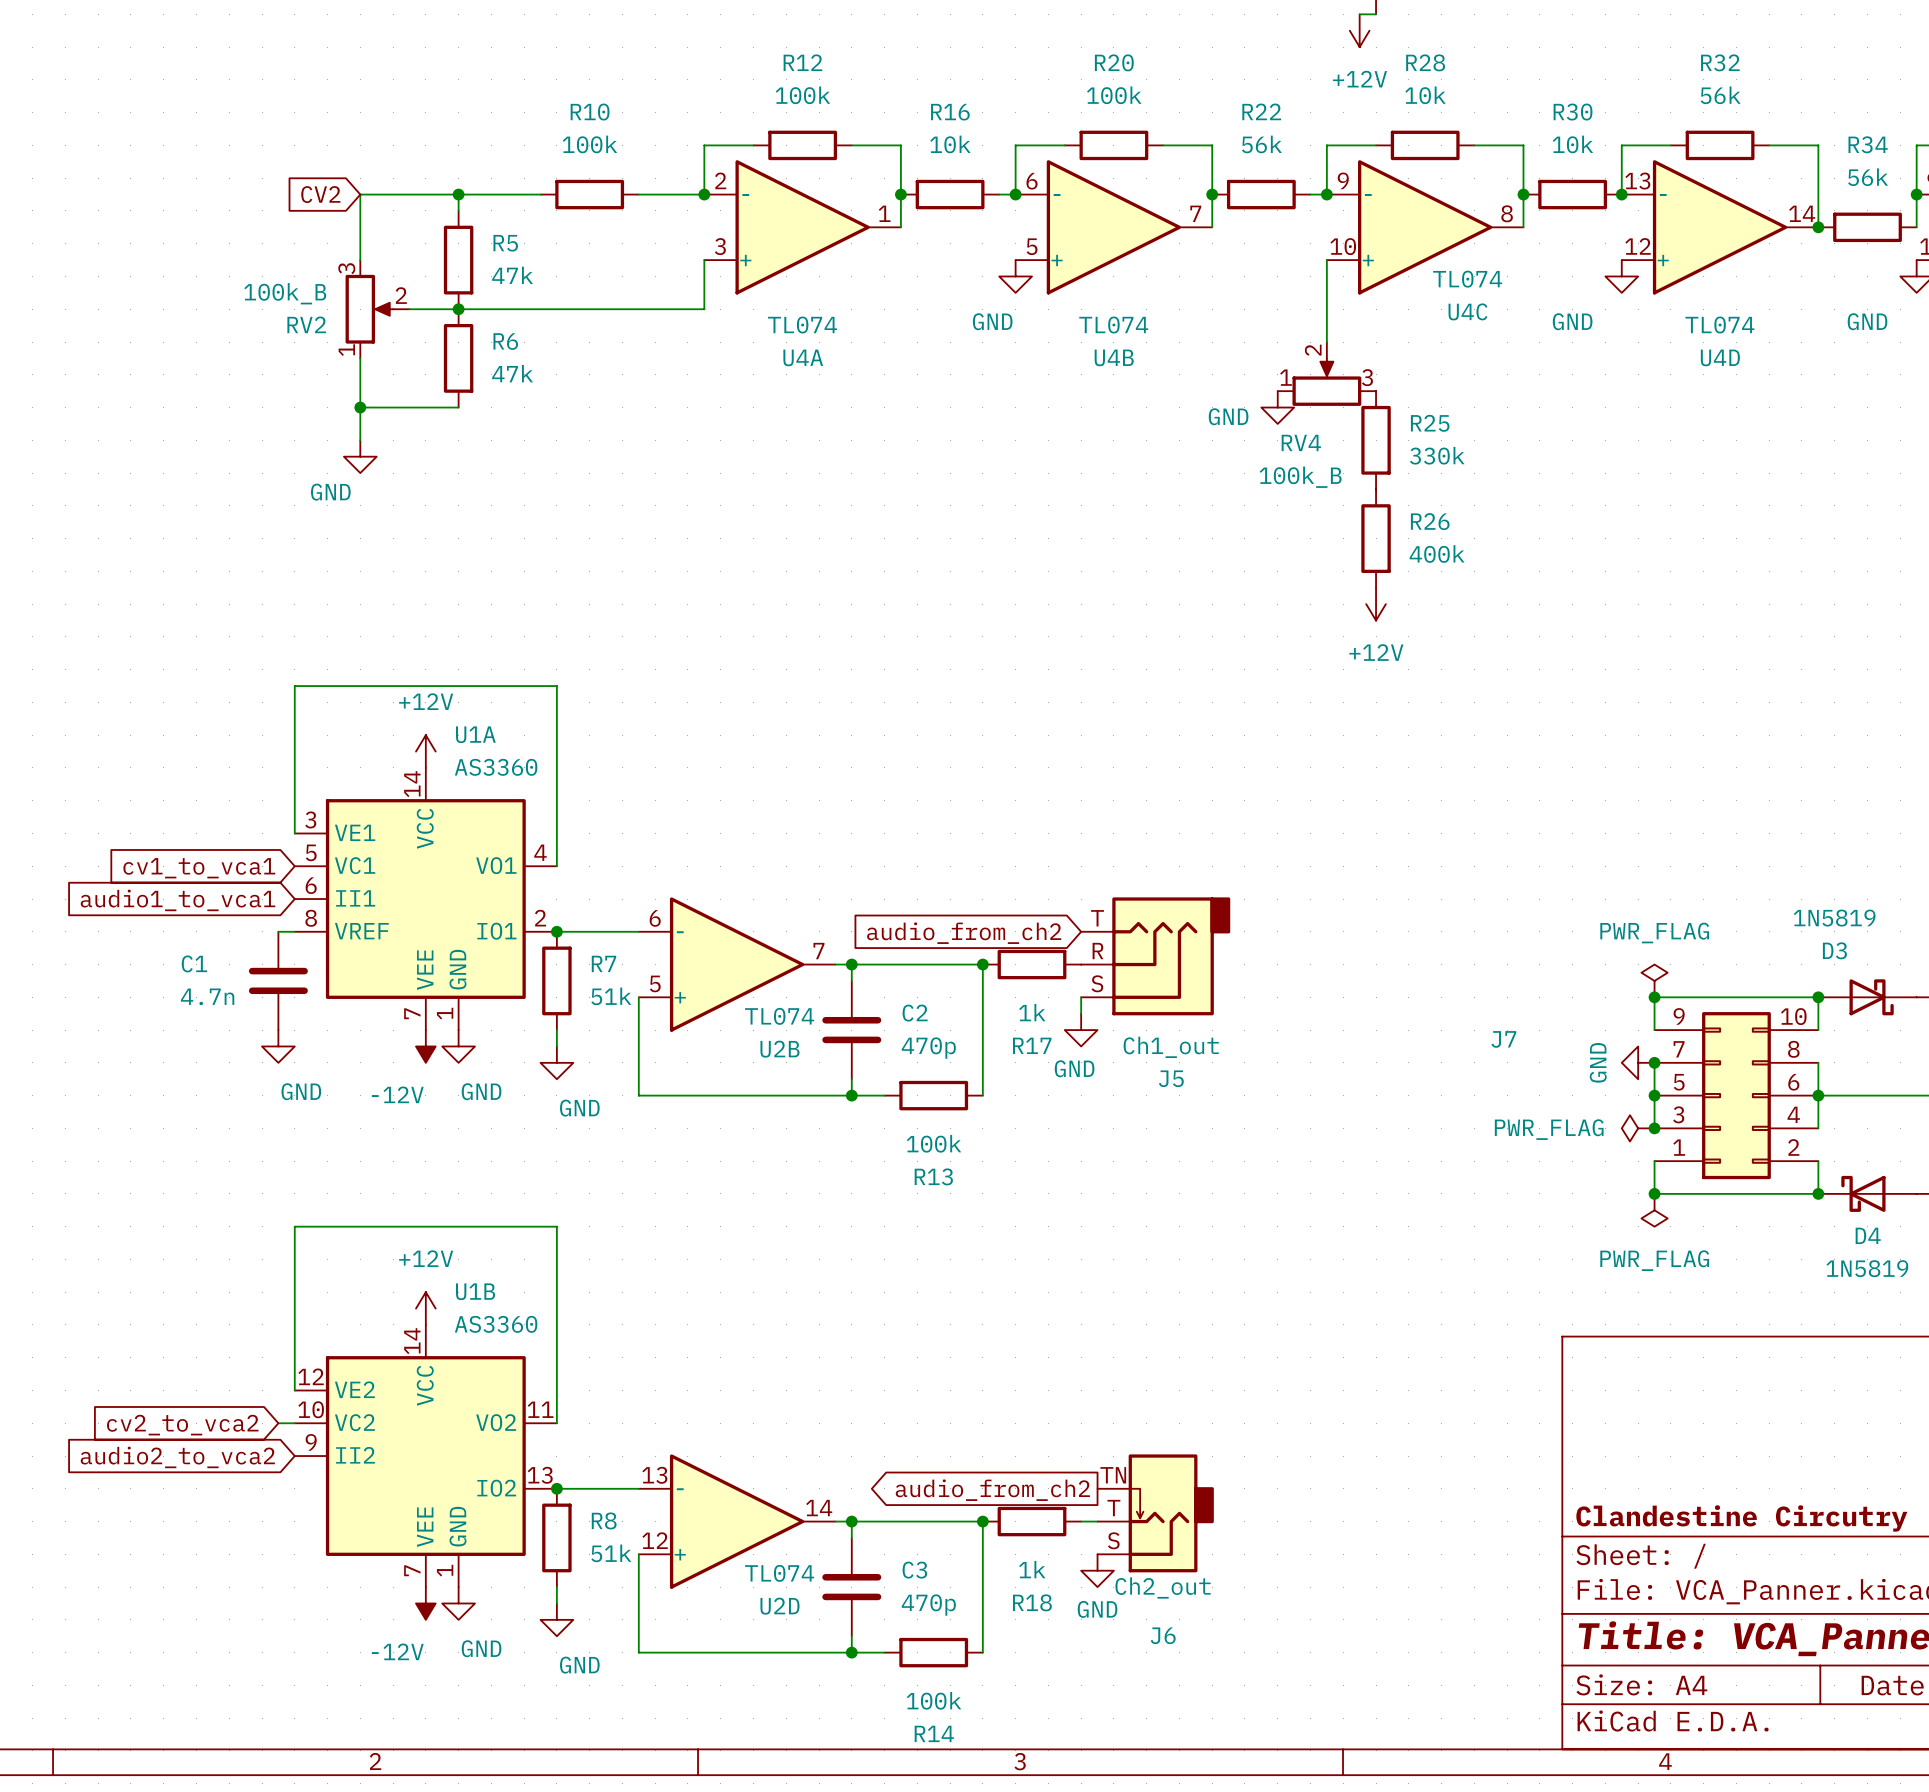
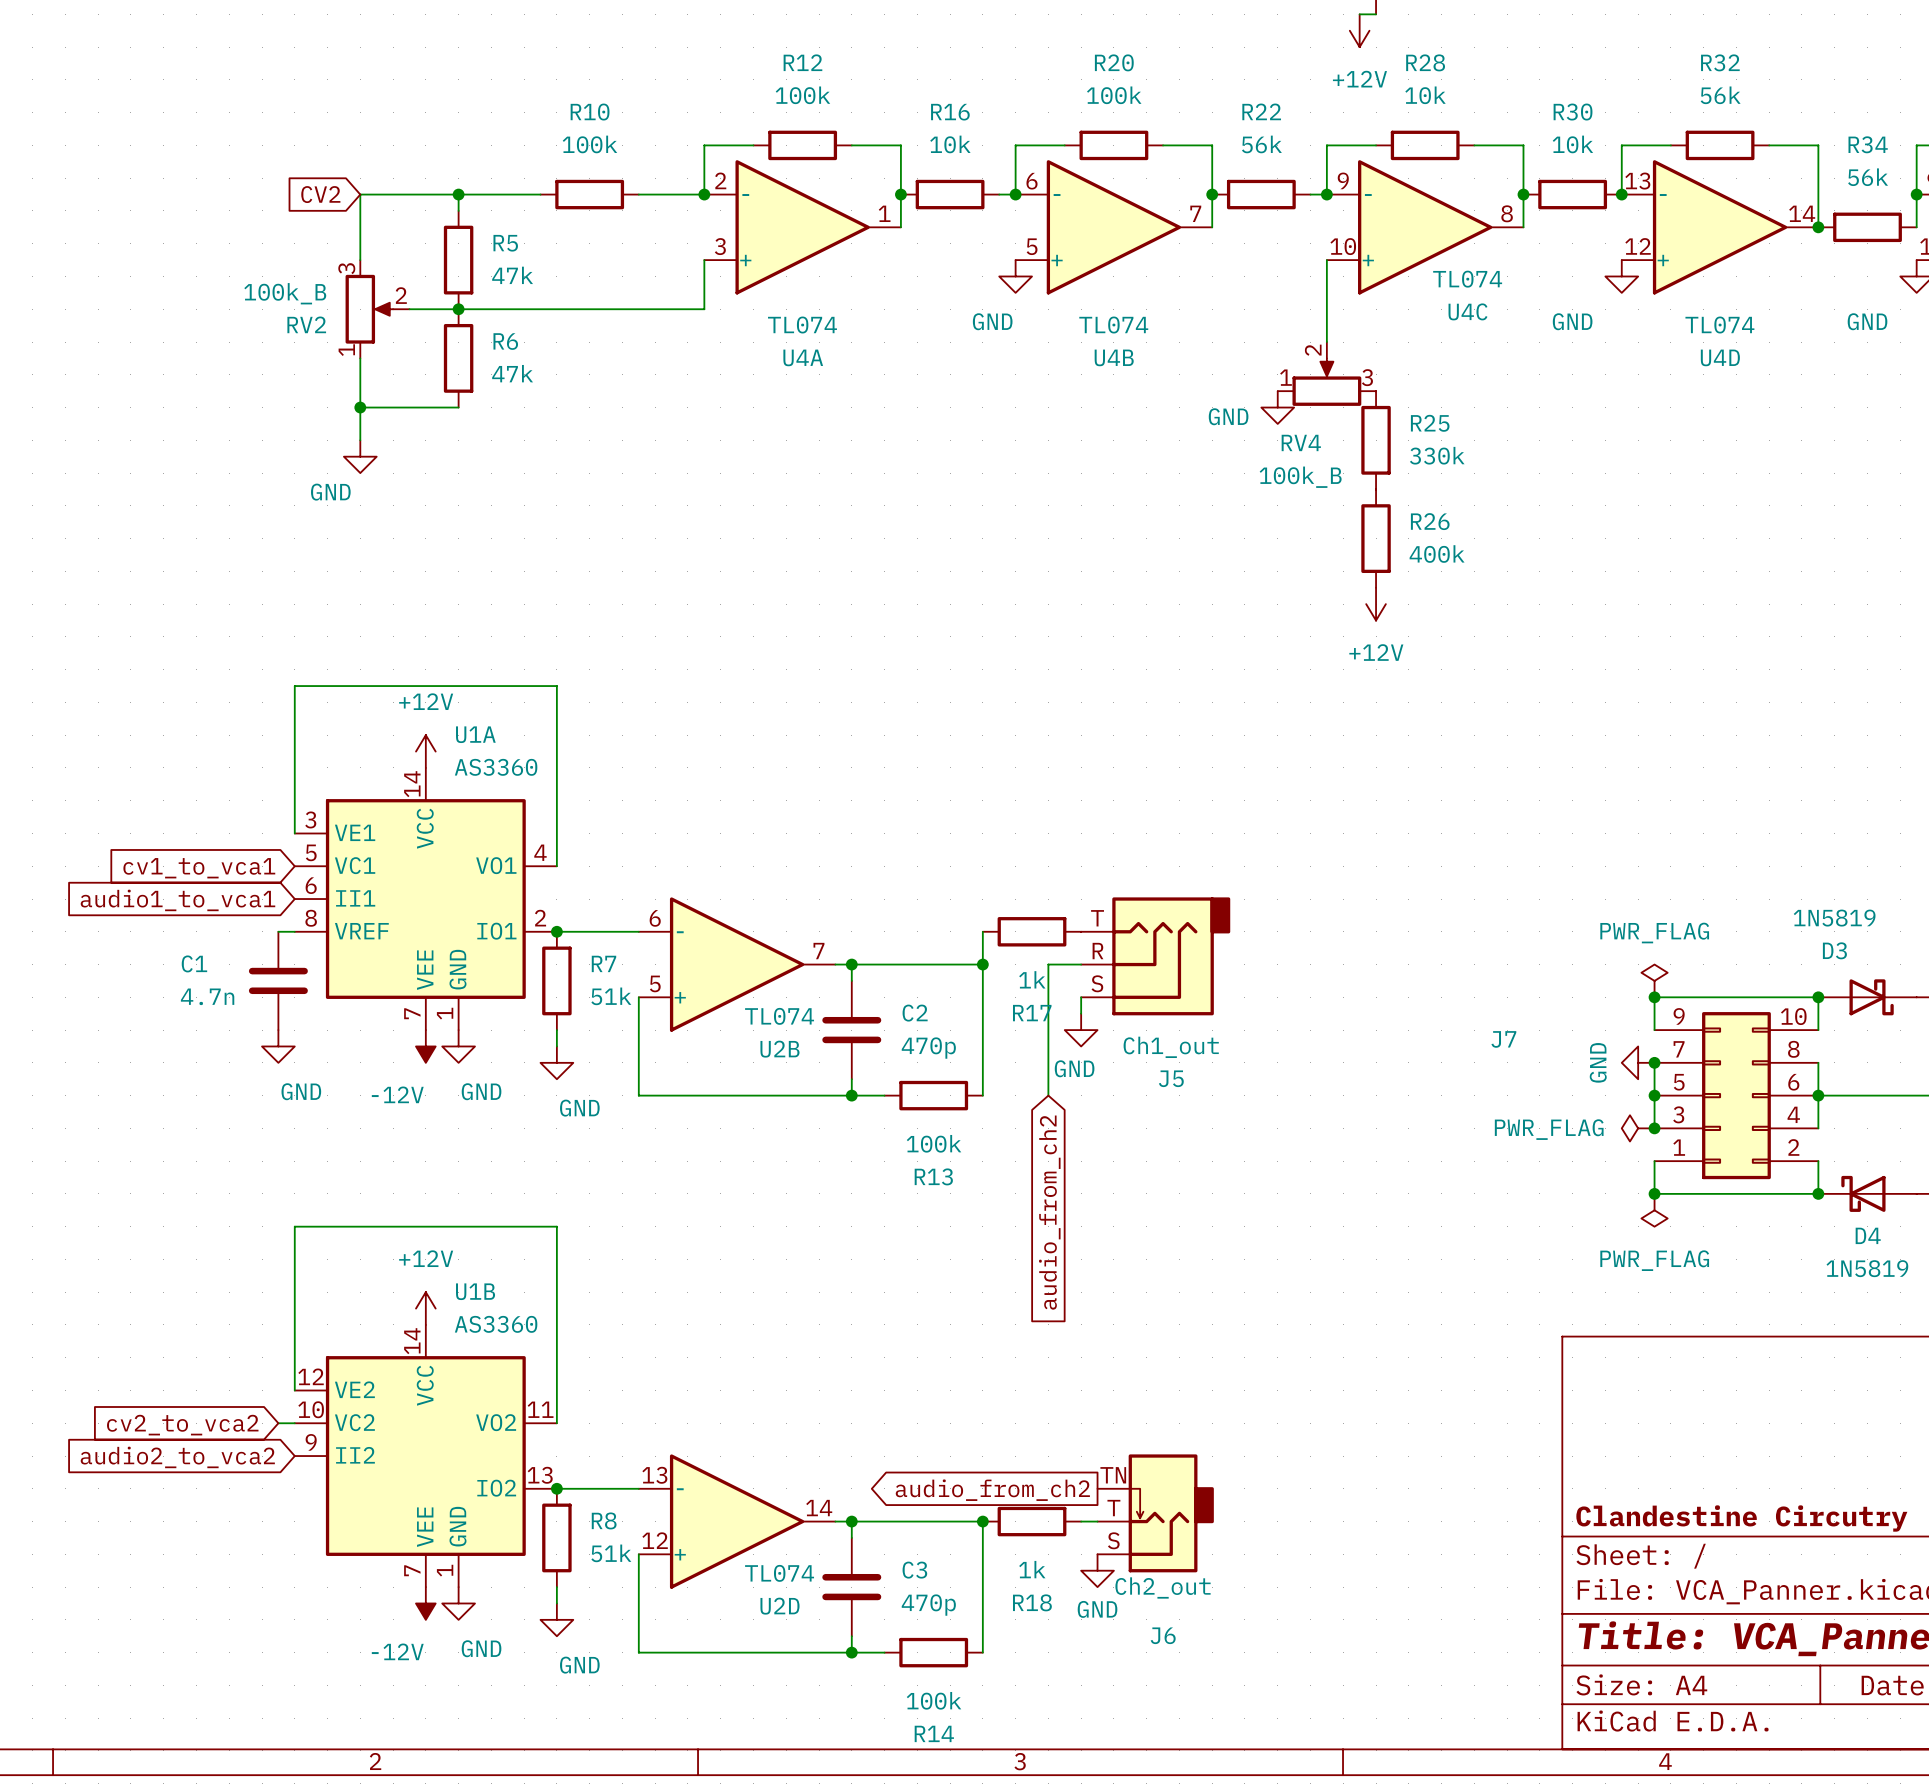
wire: none -> (982, 931) (982, 964)
global label rotation: 0° (964, 933) -> 90° counterclockwise (1049, 1212)
global label position: audio_from_ch2 (964, 933) -> audio_from_ch2 (1049, 1212)
R17 position: (1032, 964) -> (1032, 931)
wire: none -> (1081, 964) (1048, 964) (1048, 1095)

